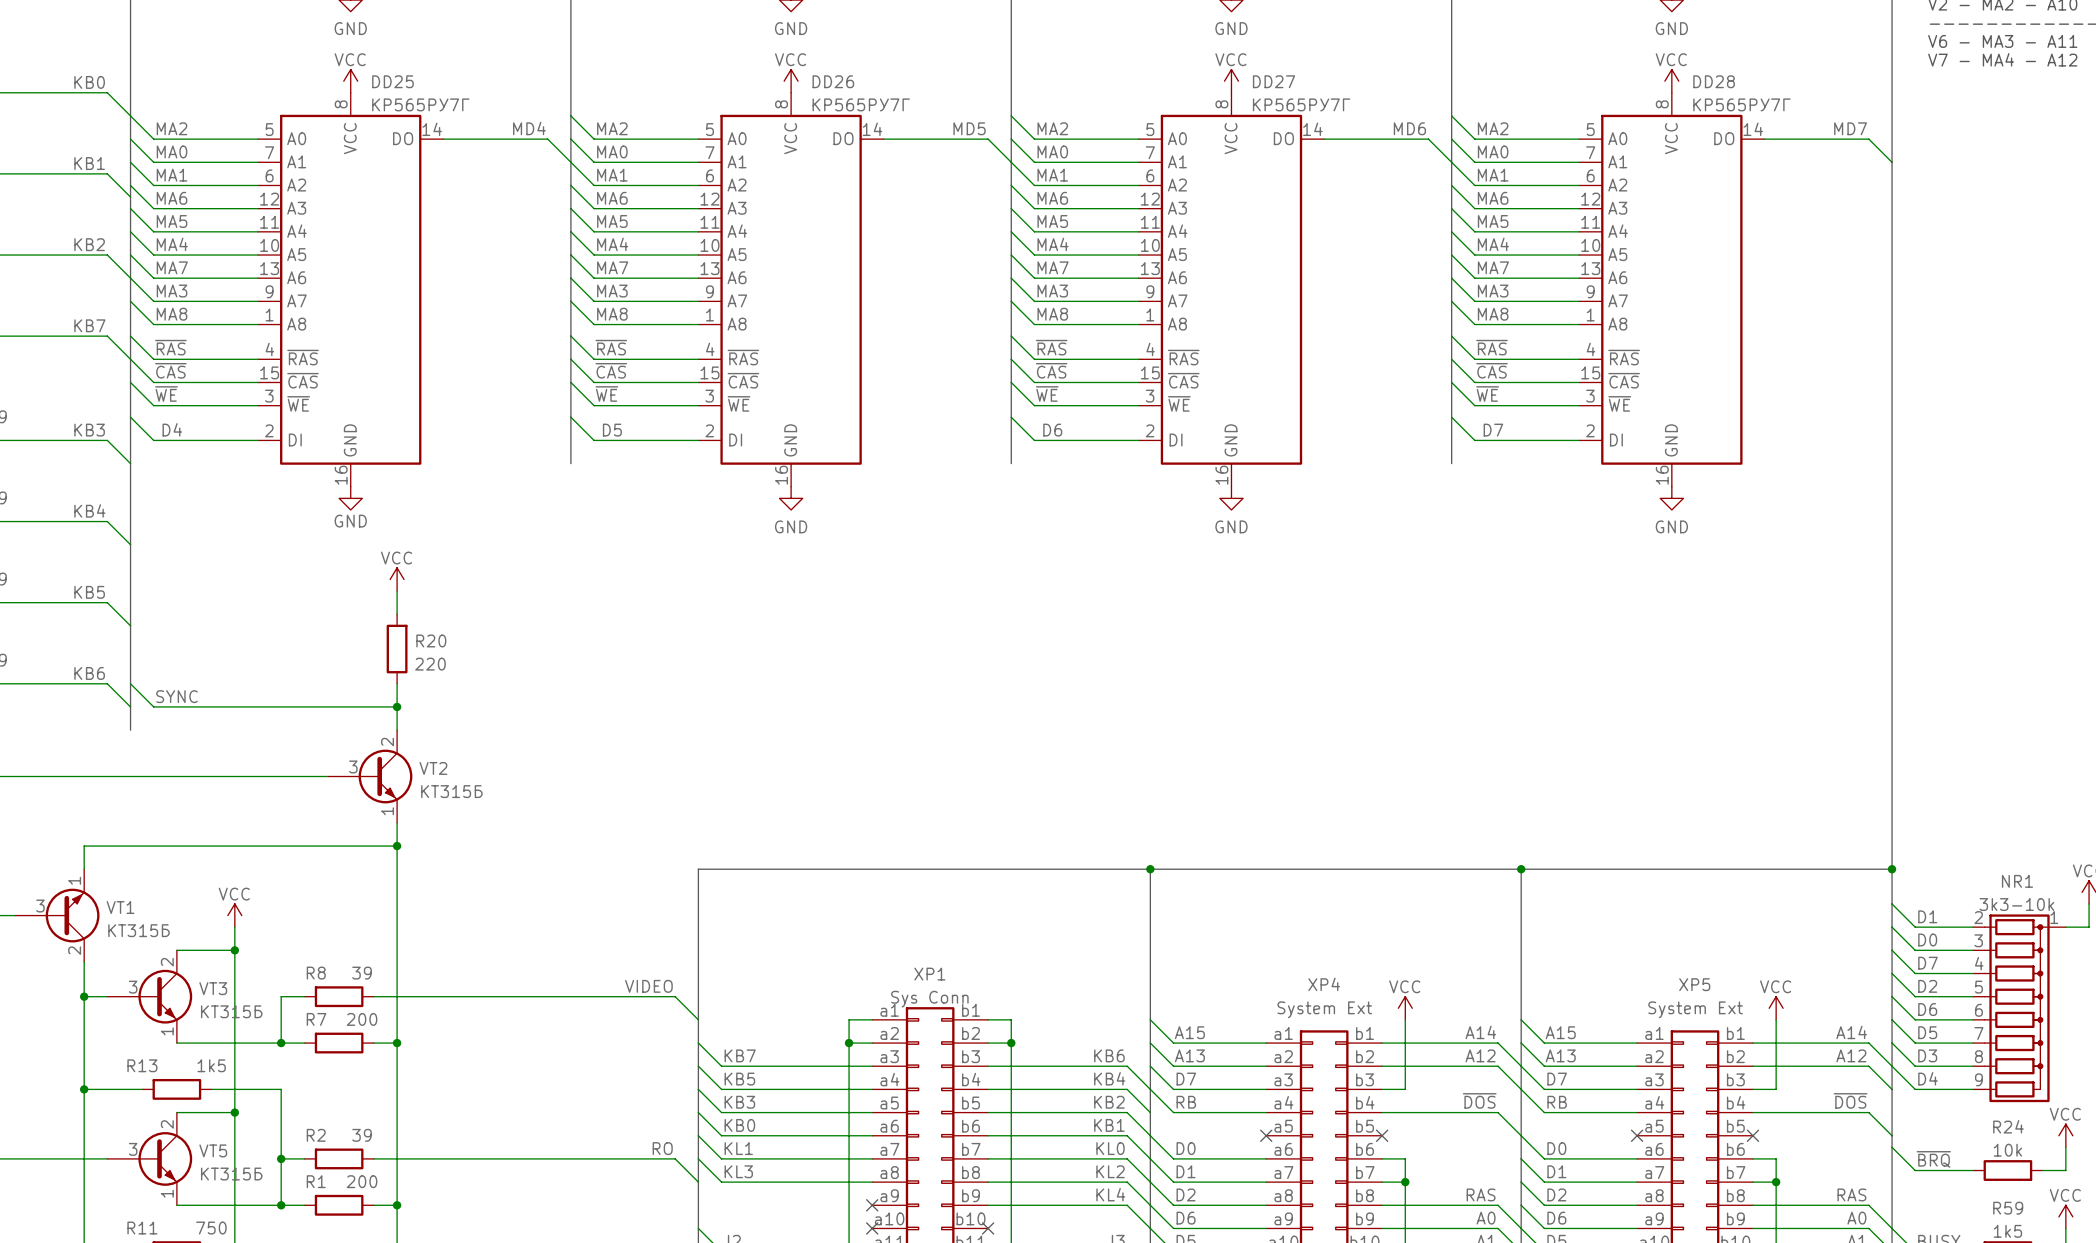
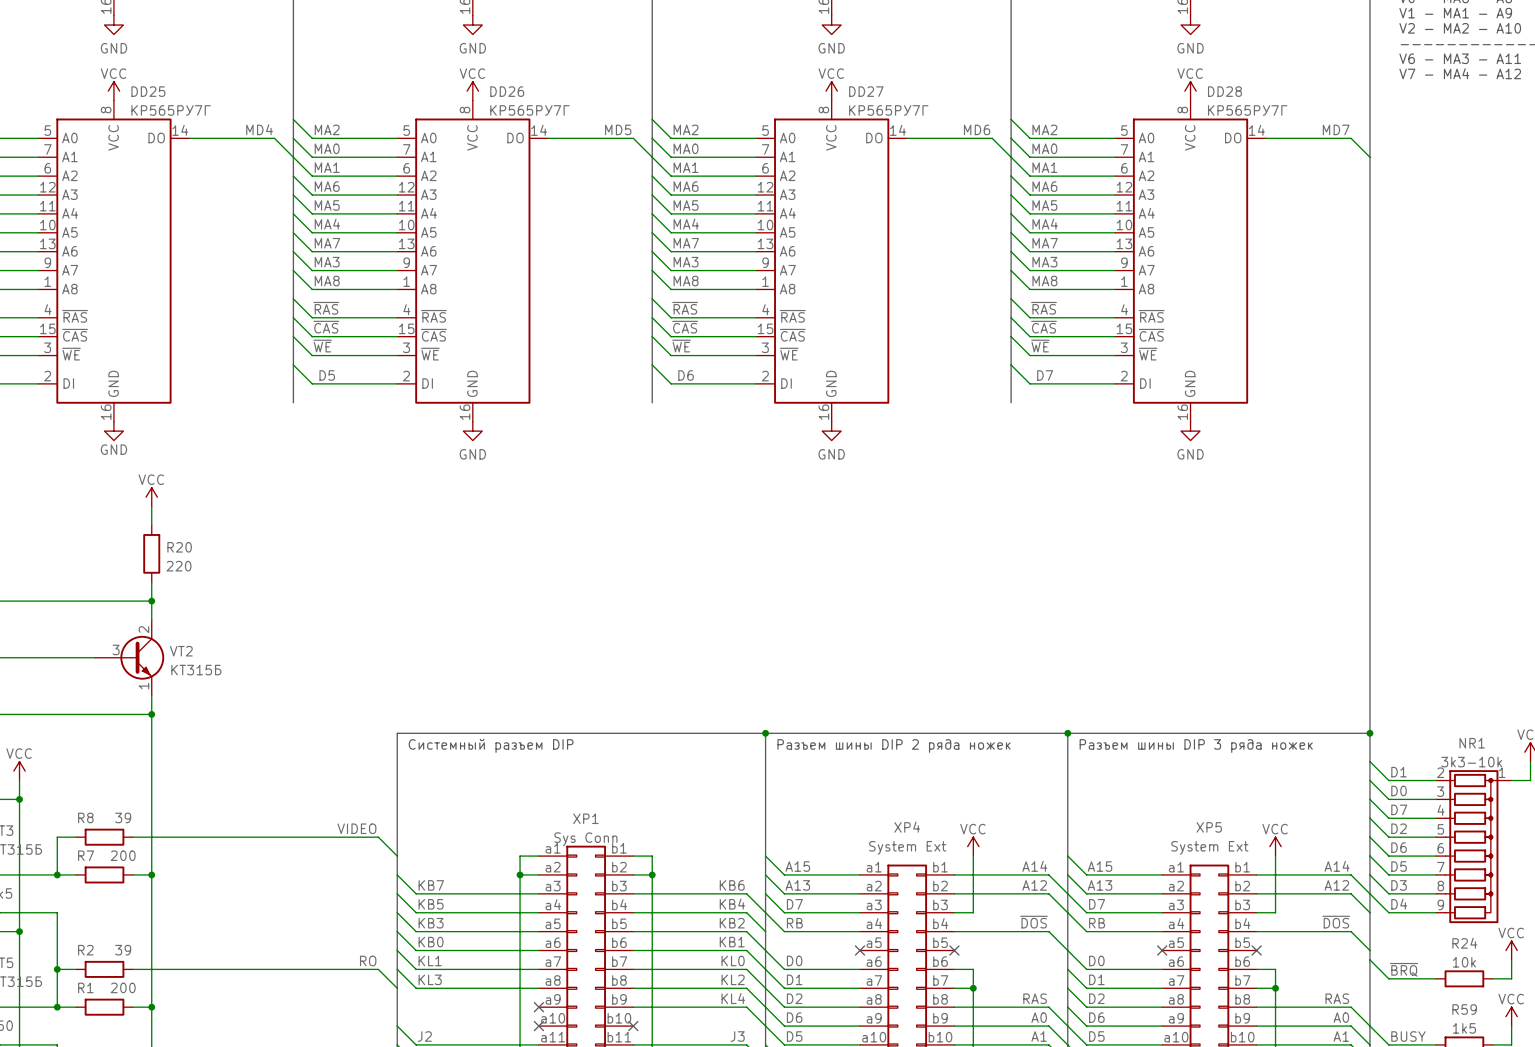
text: none -> Системный разъем DIP (491, 745)
text: none -> Разъем шины DIP 2 ряда ножек (894, 746)
text: none -> Разъем шины DIP 3 ряда ножек (1196, 746)

